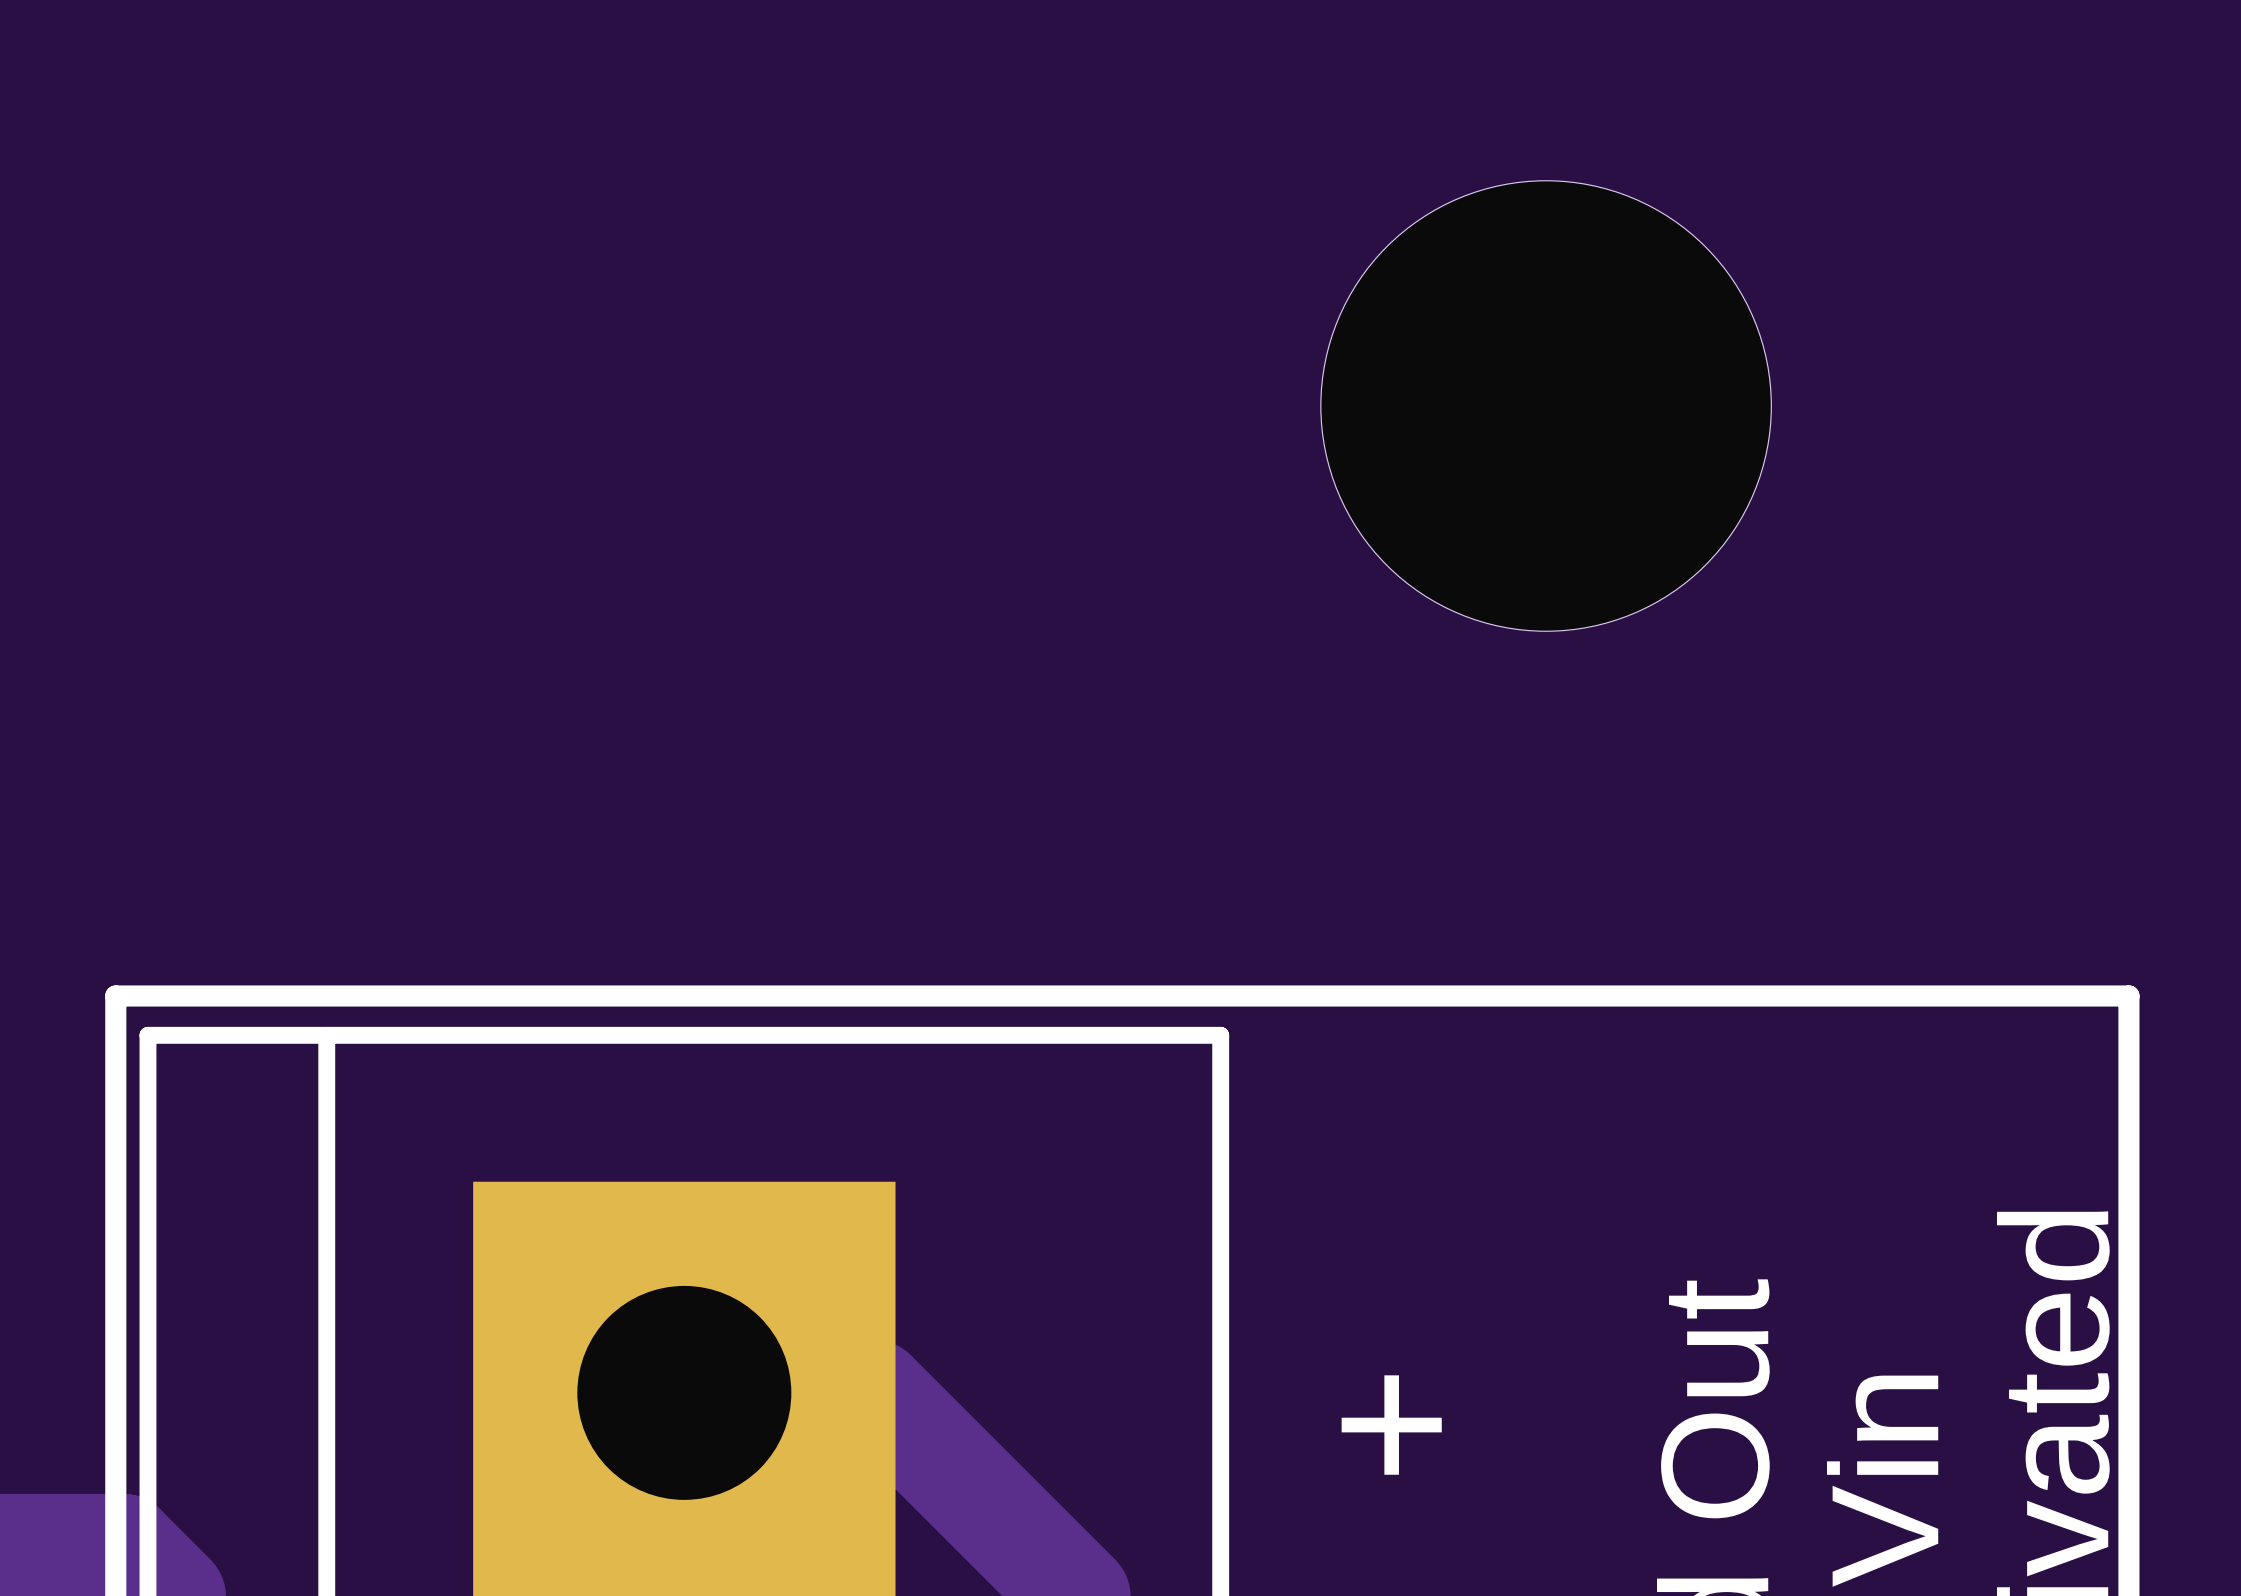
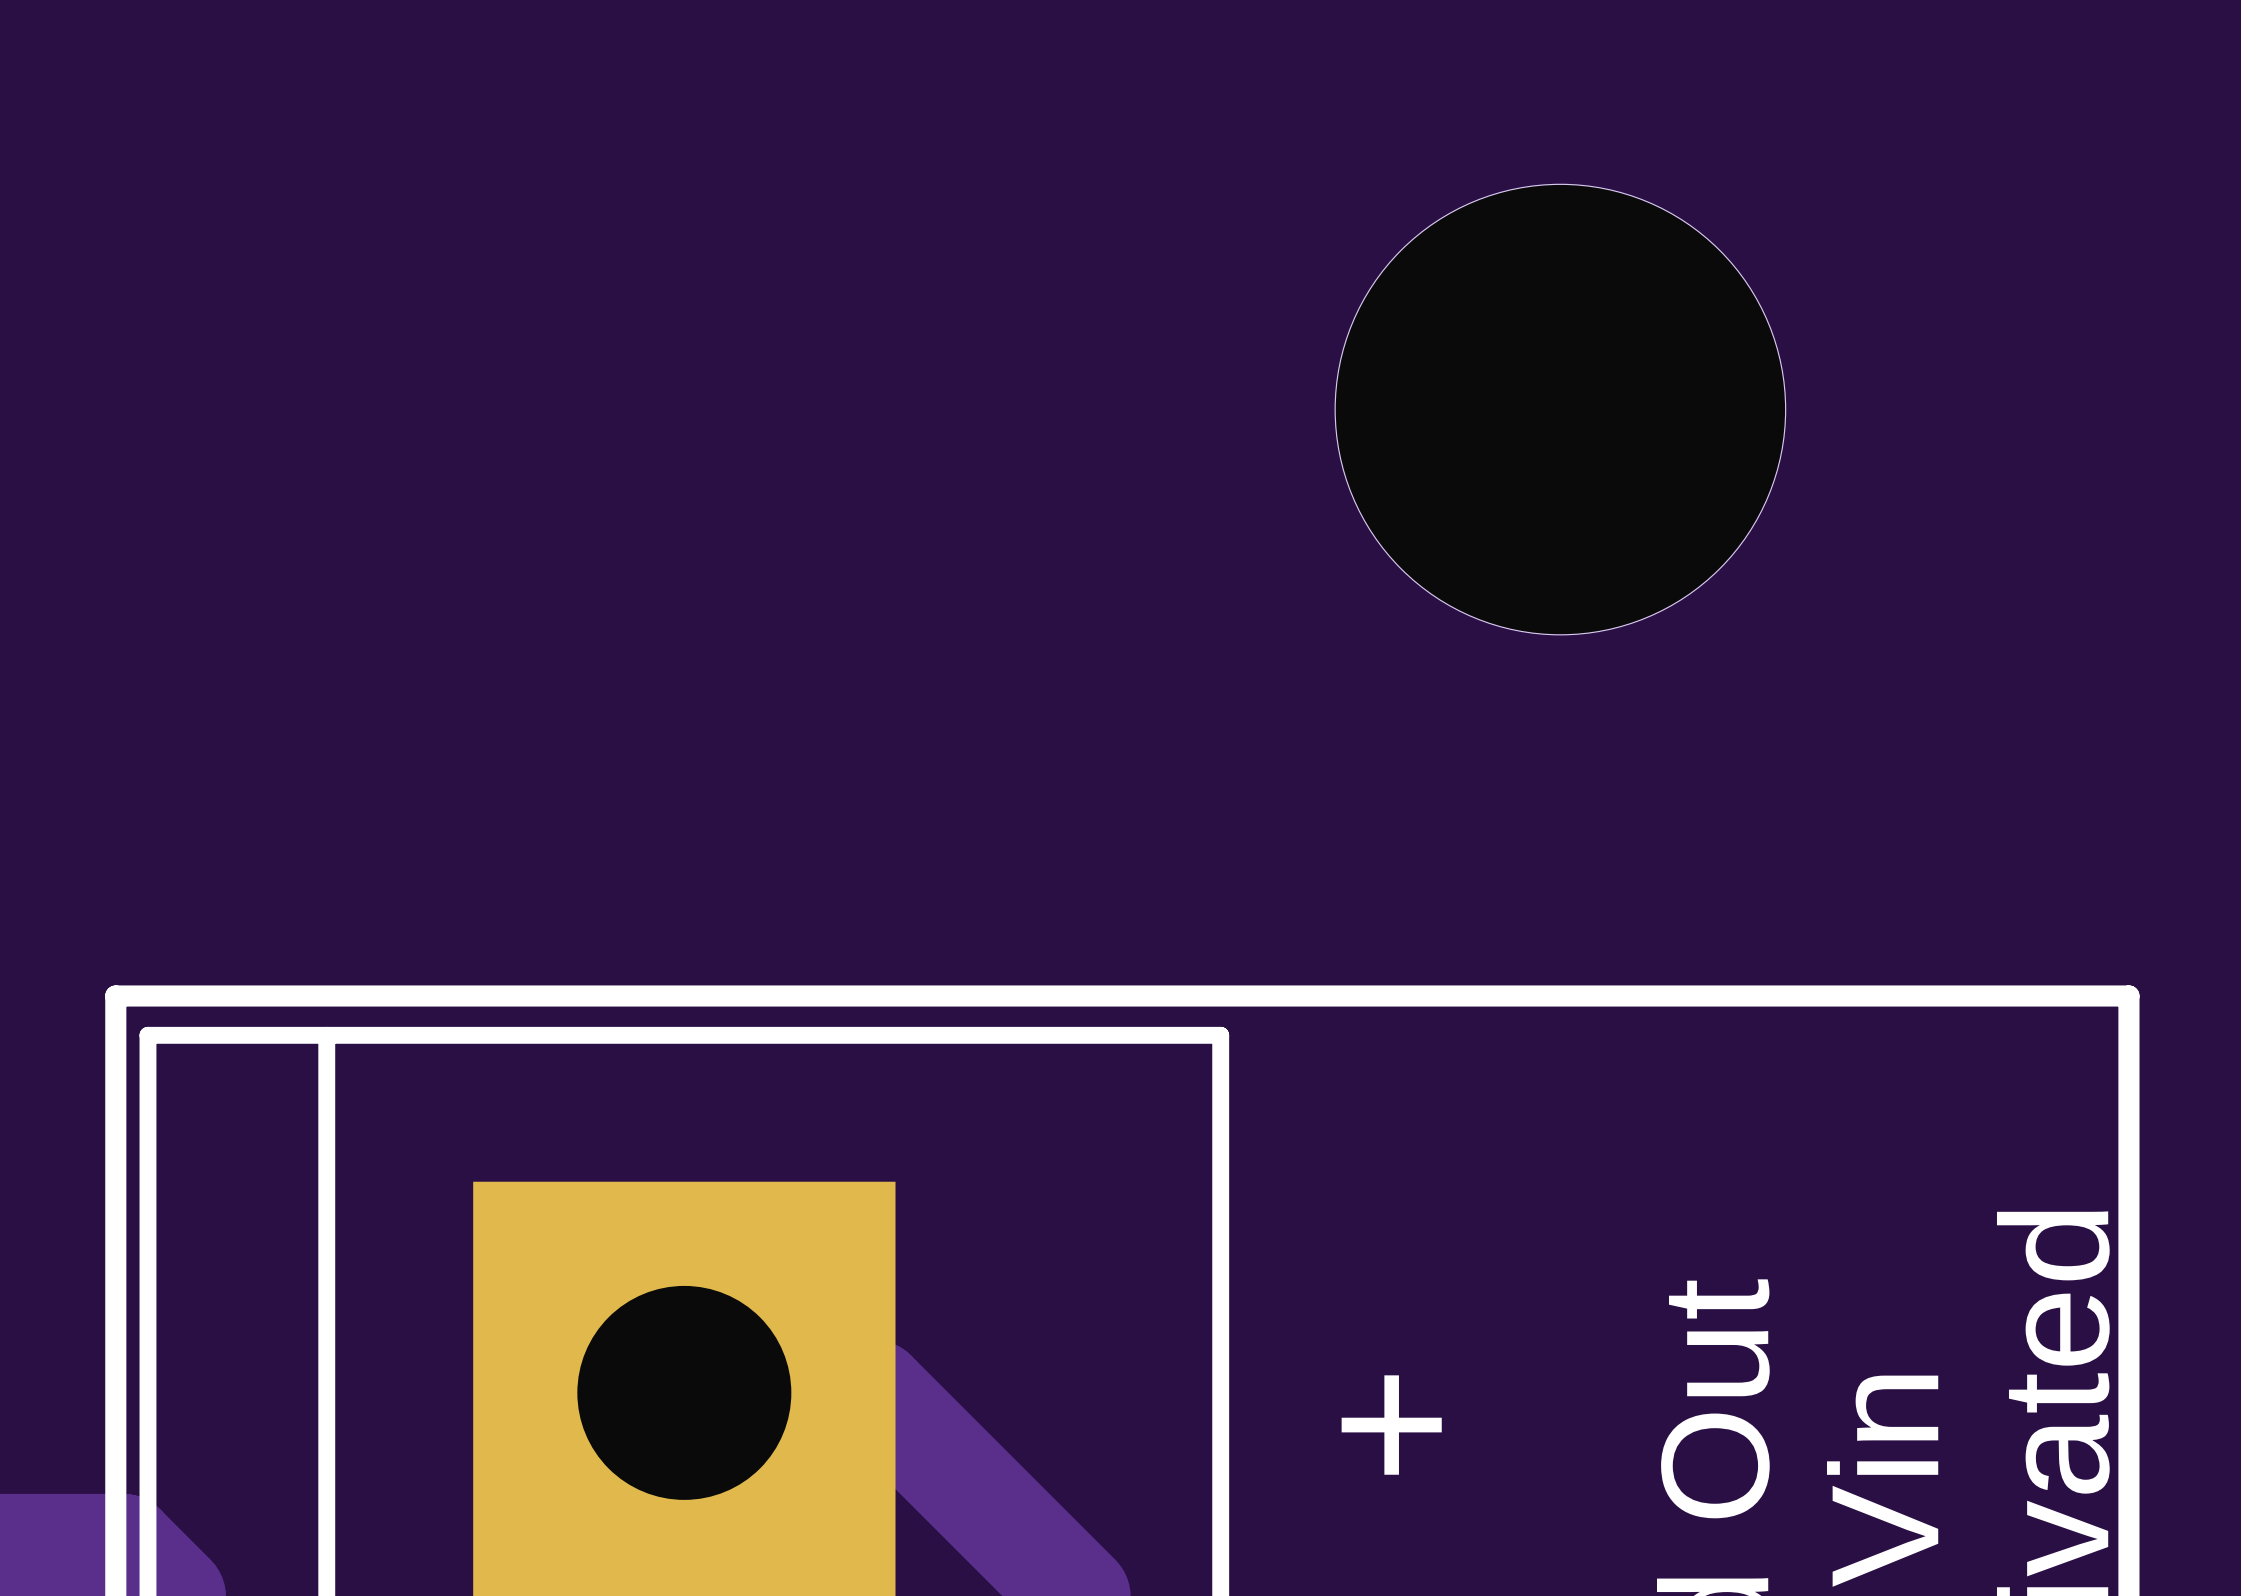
part position: (1546, 406) -> (1560, 409)

